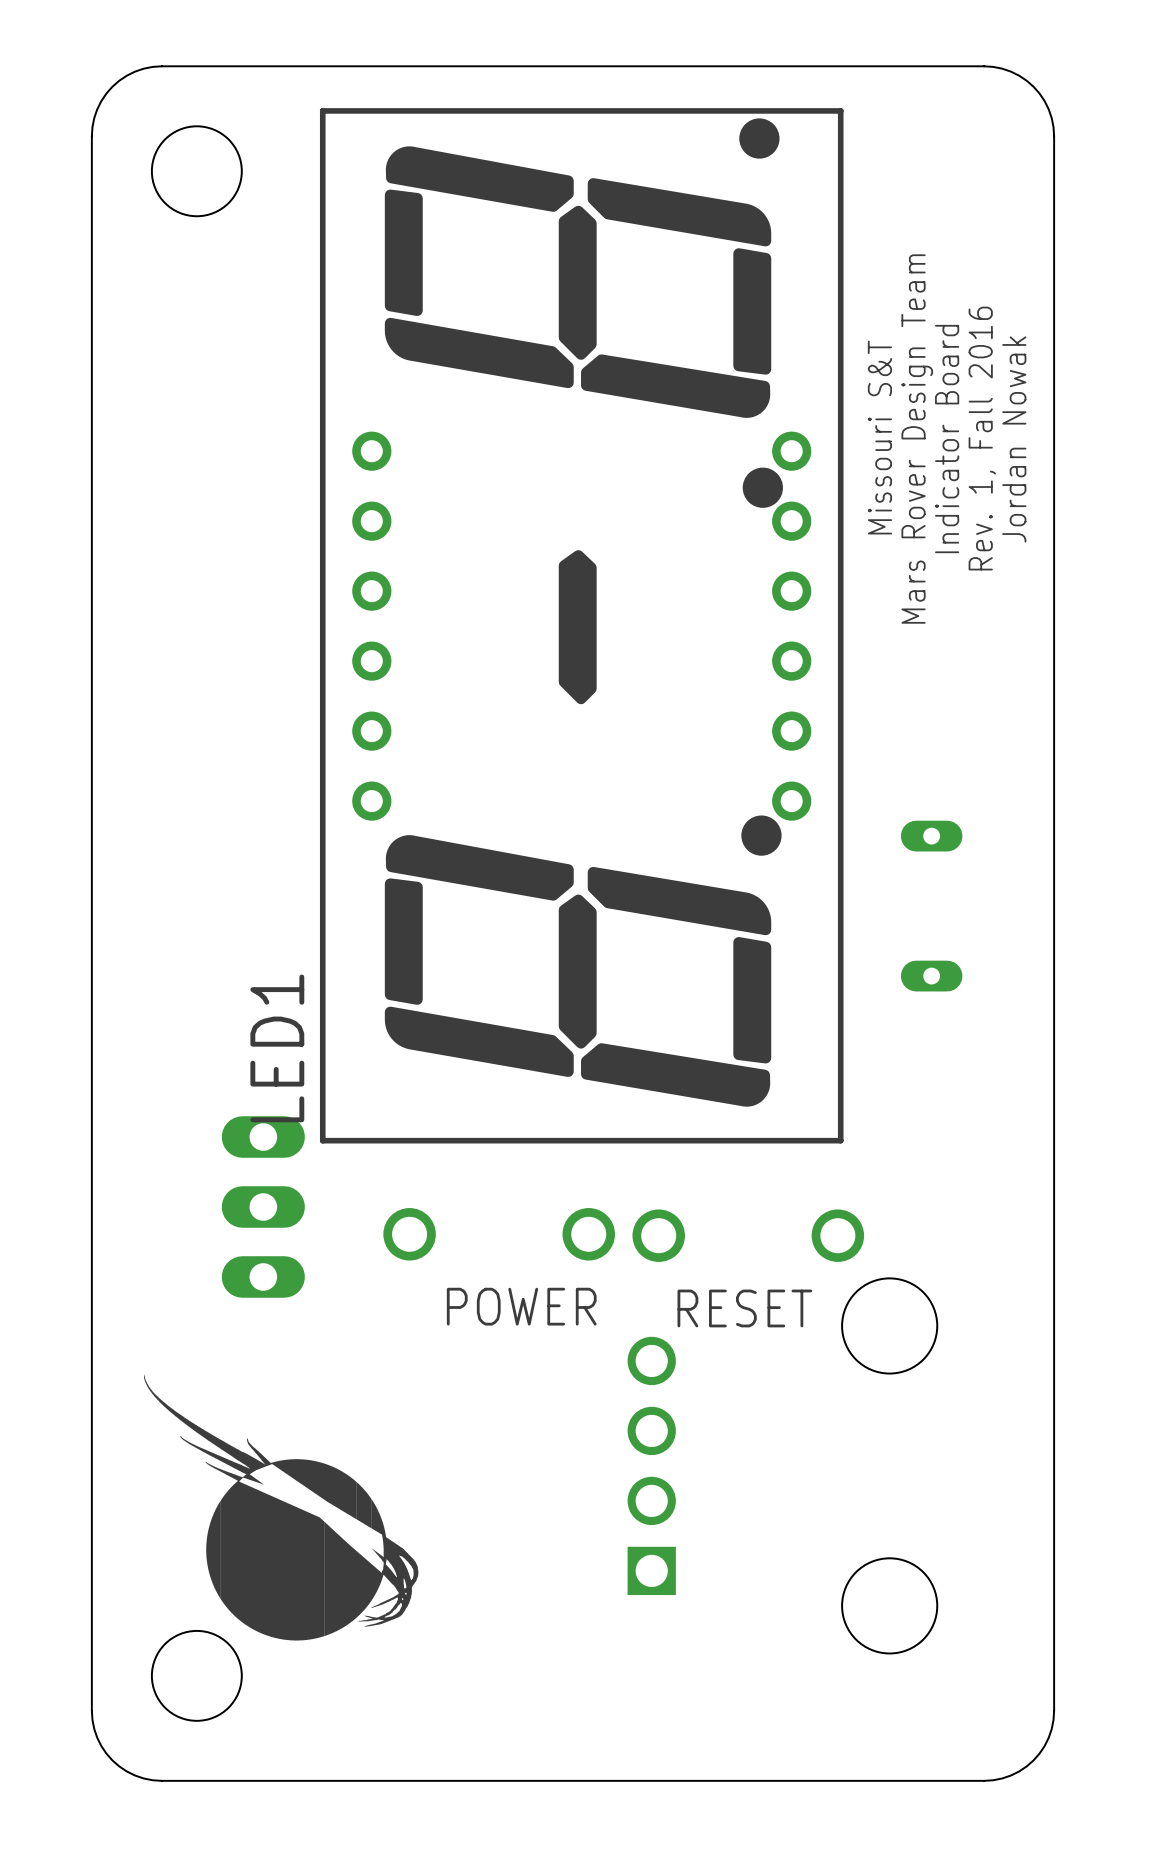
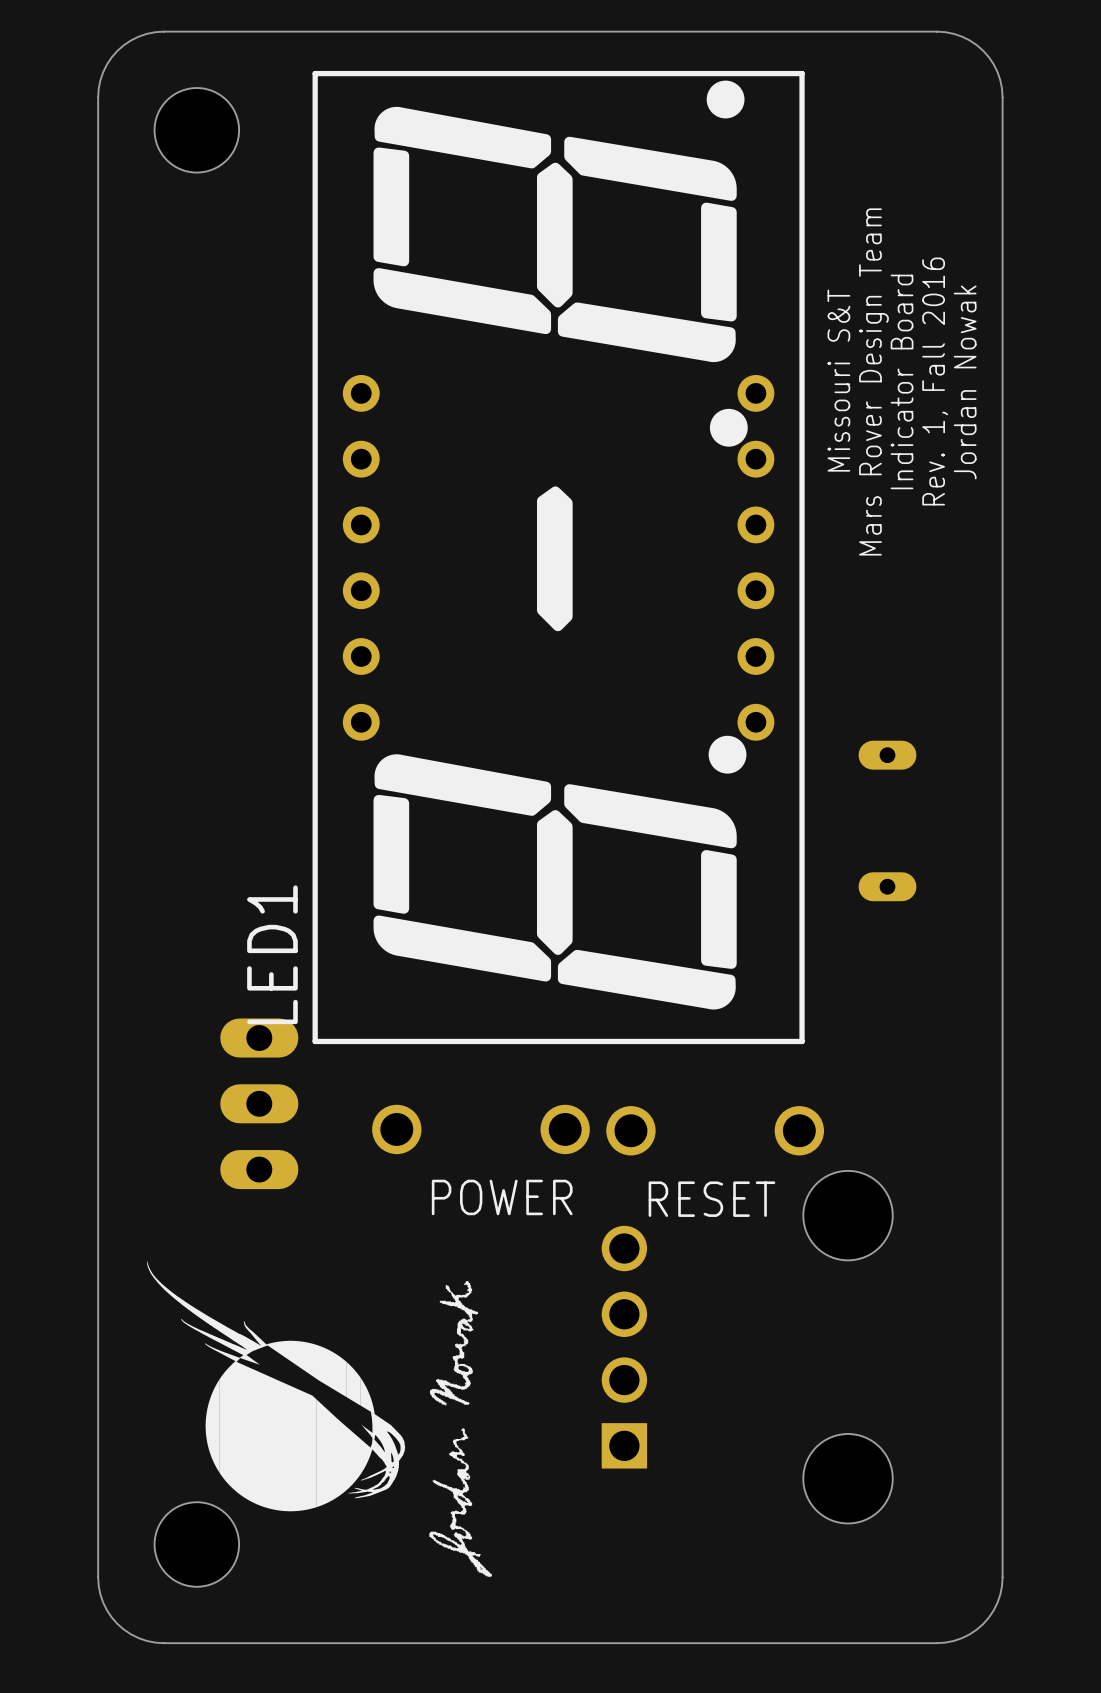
drawing: none -> [429, 1281, 492, 1578]

